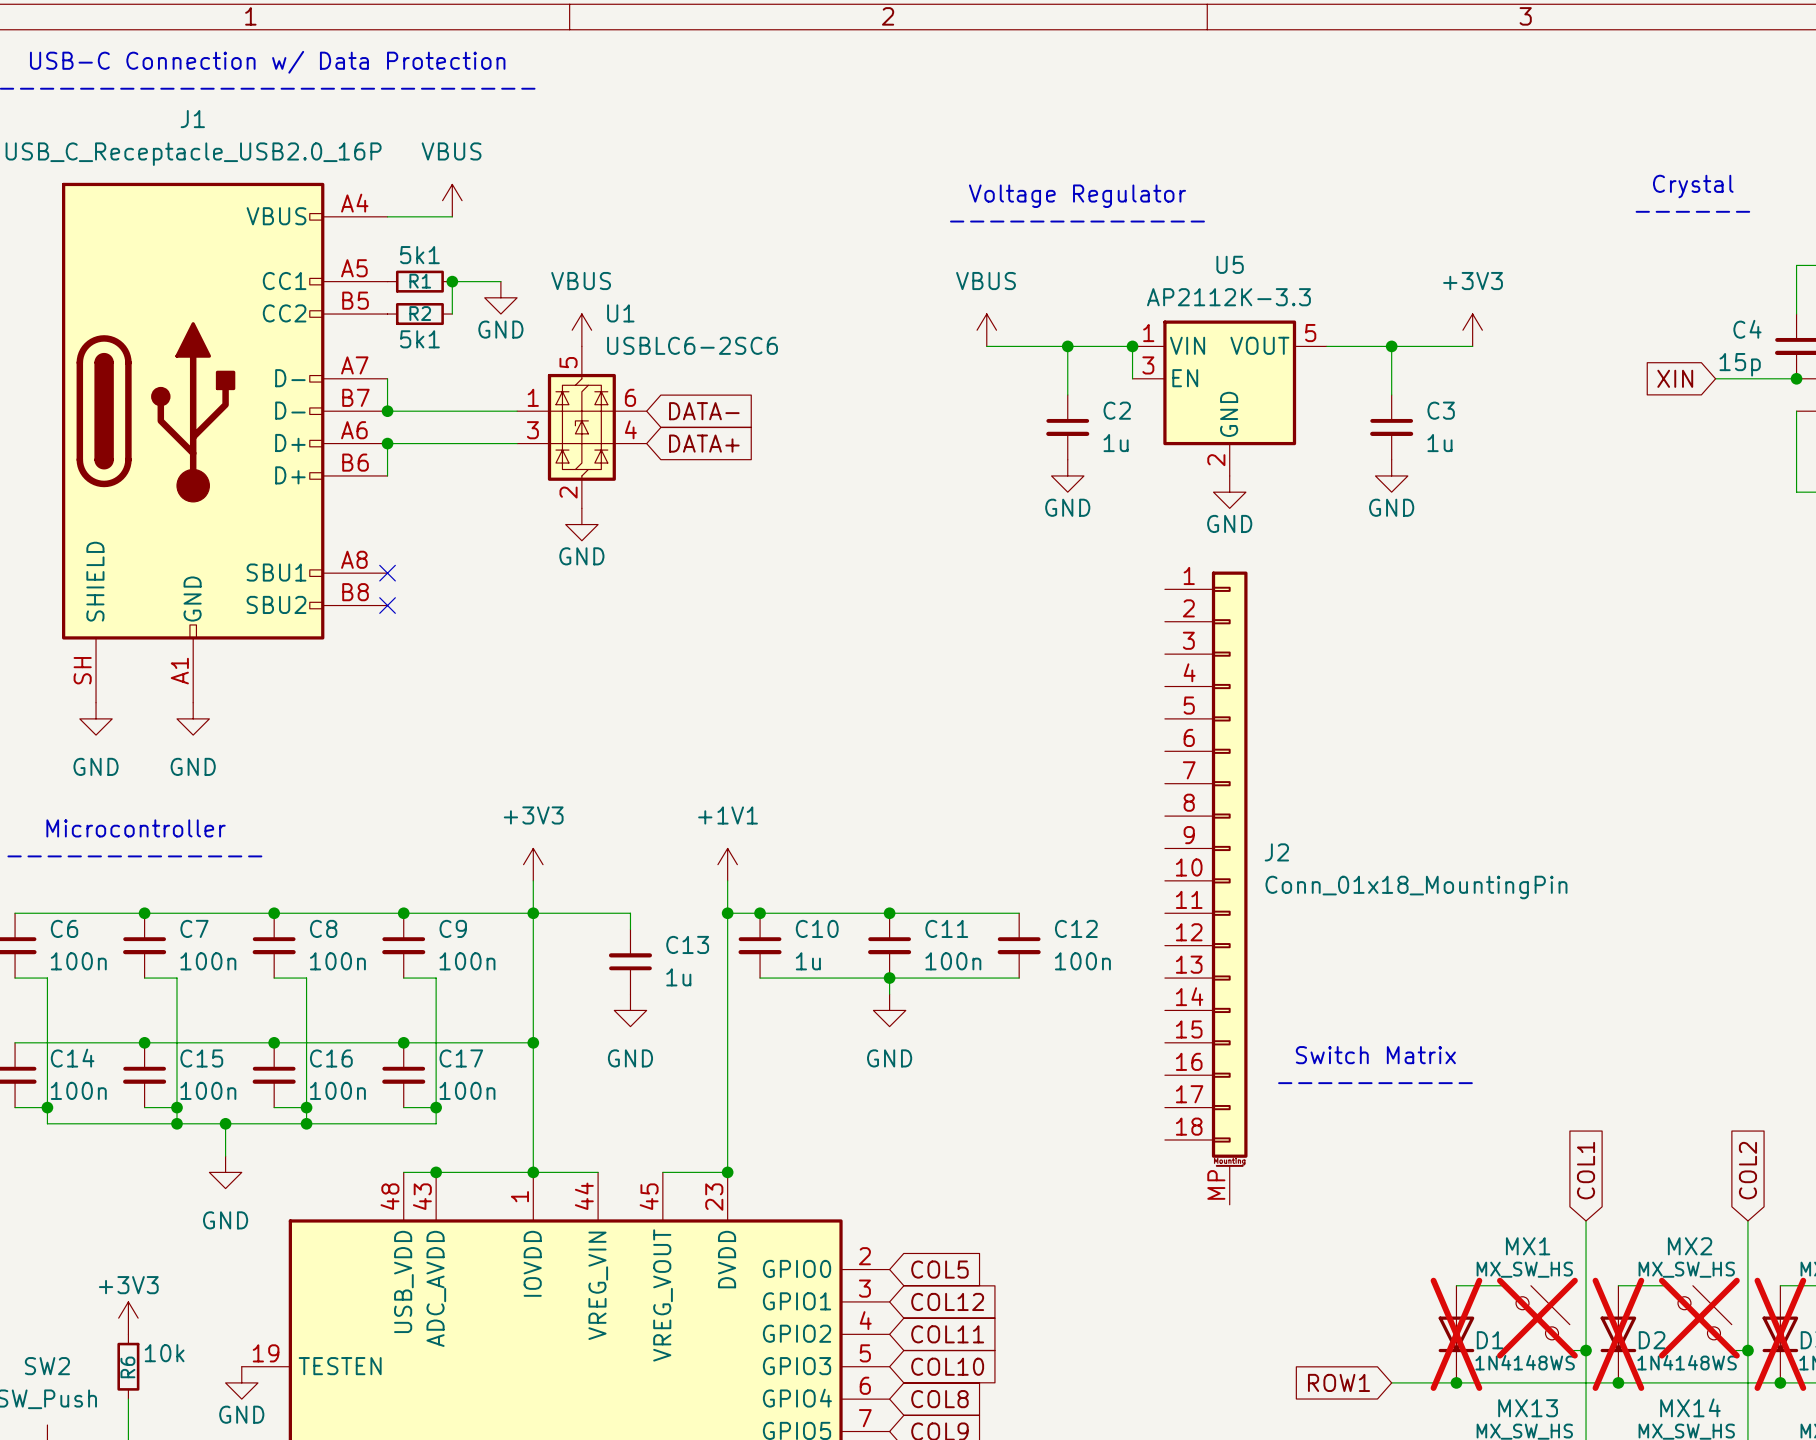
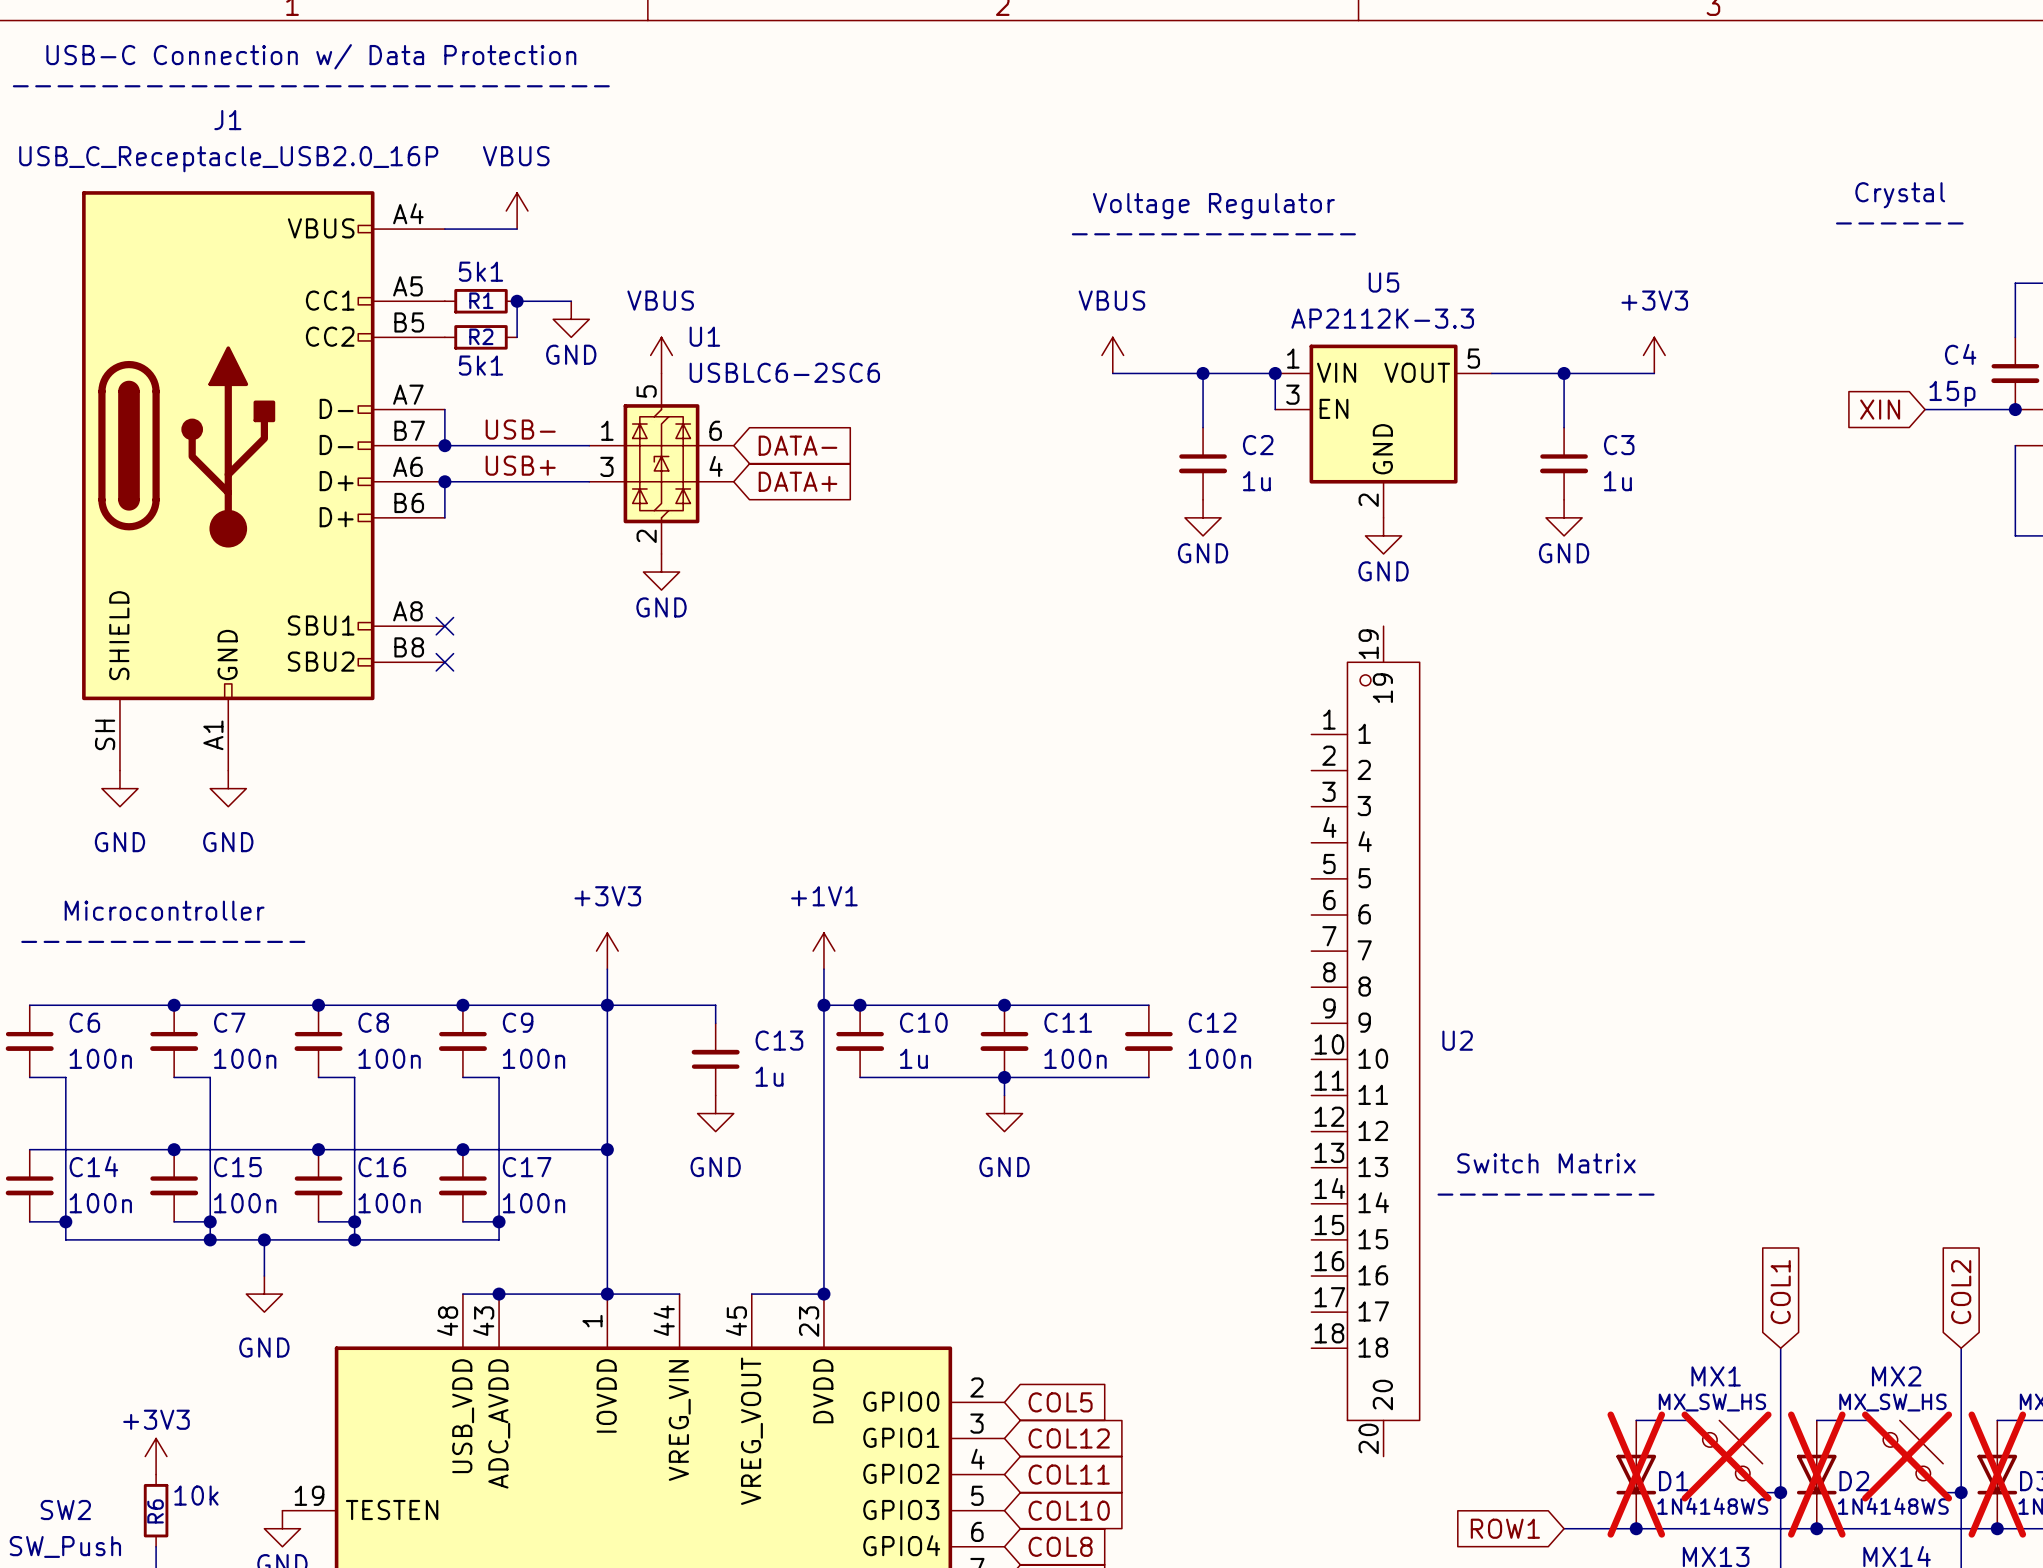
label: none -> USB- (520, 429)
label: none -> USB+ (520, 465)
J2: Conn_01x18_MountingPin (1206, 888) -> none
U2: none -> (1365, 1041)

